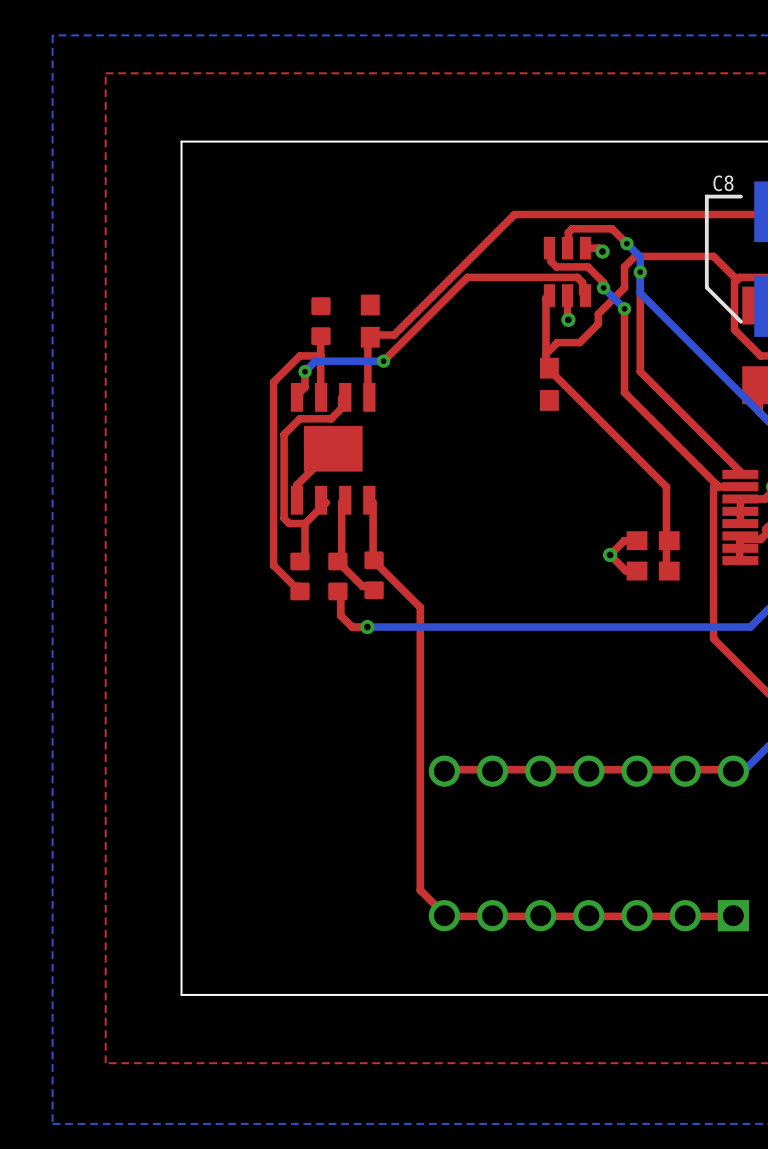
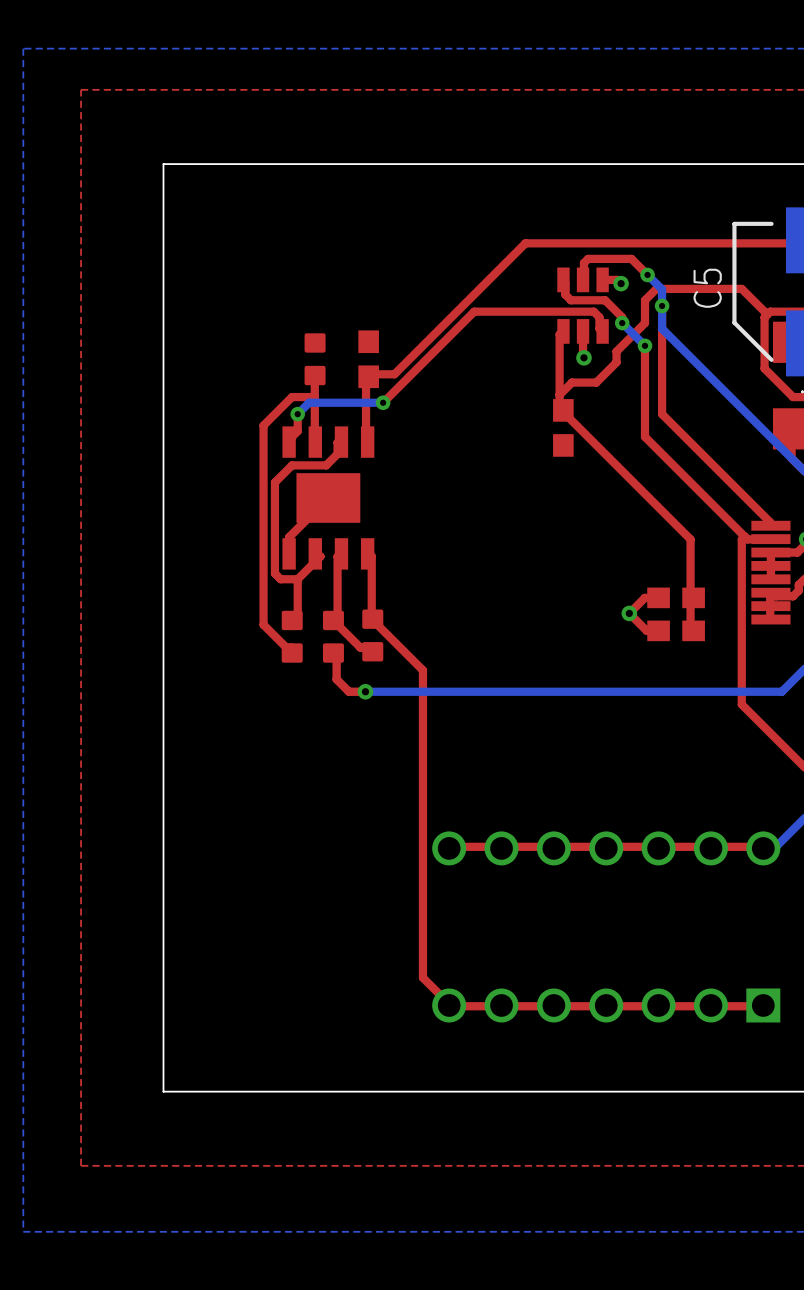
C8 name: C8 (723, 183) -> C5 (707, 288)

